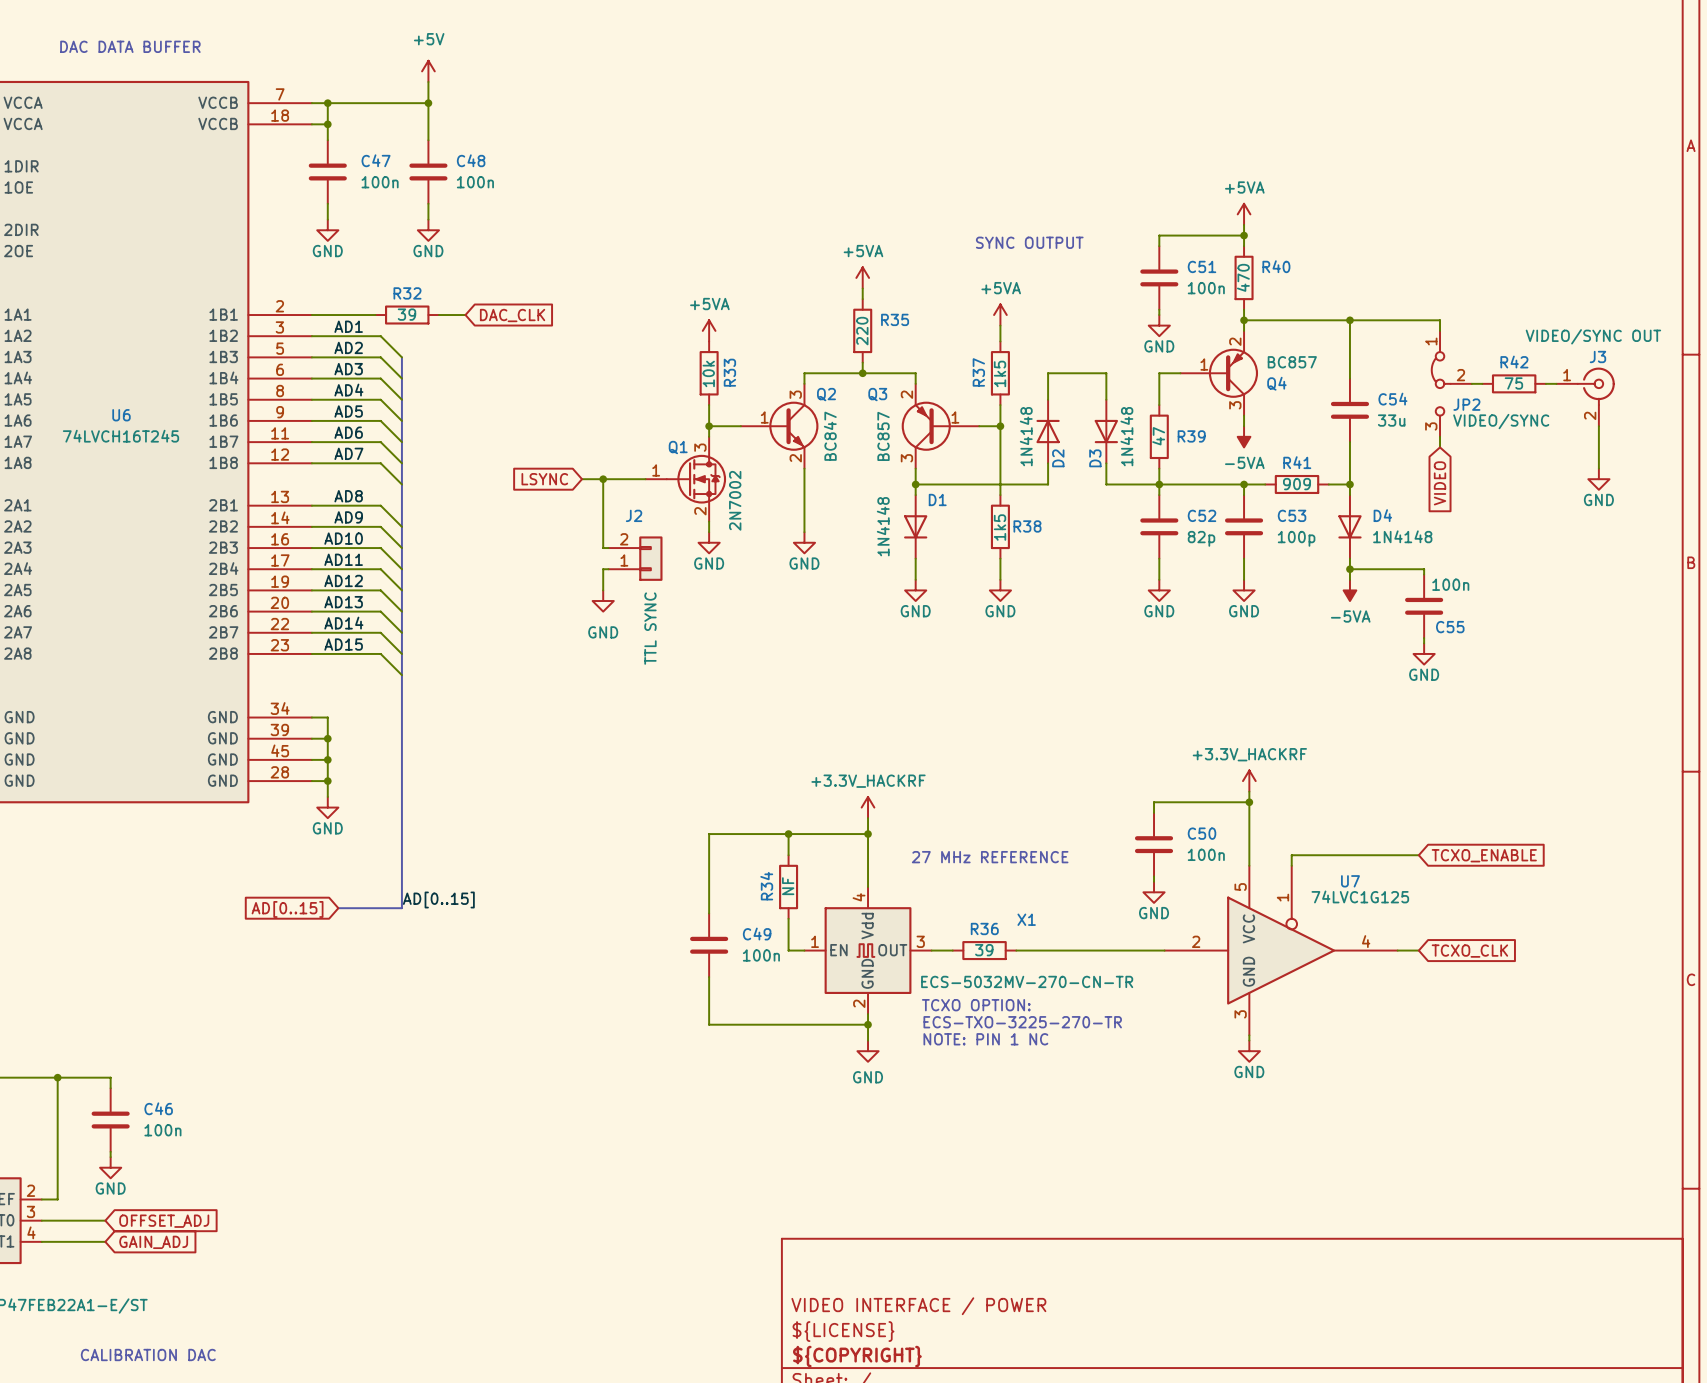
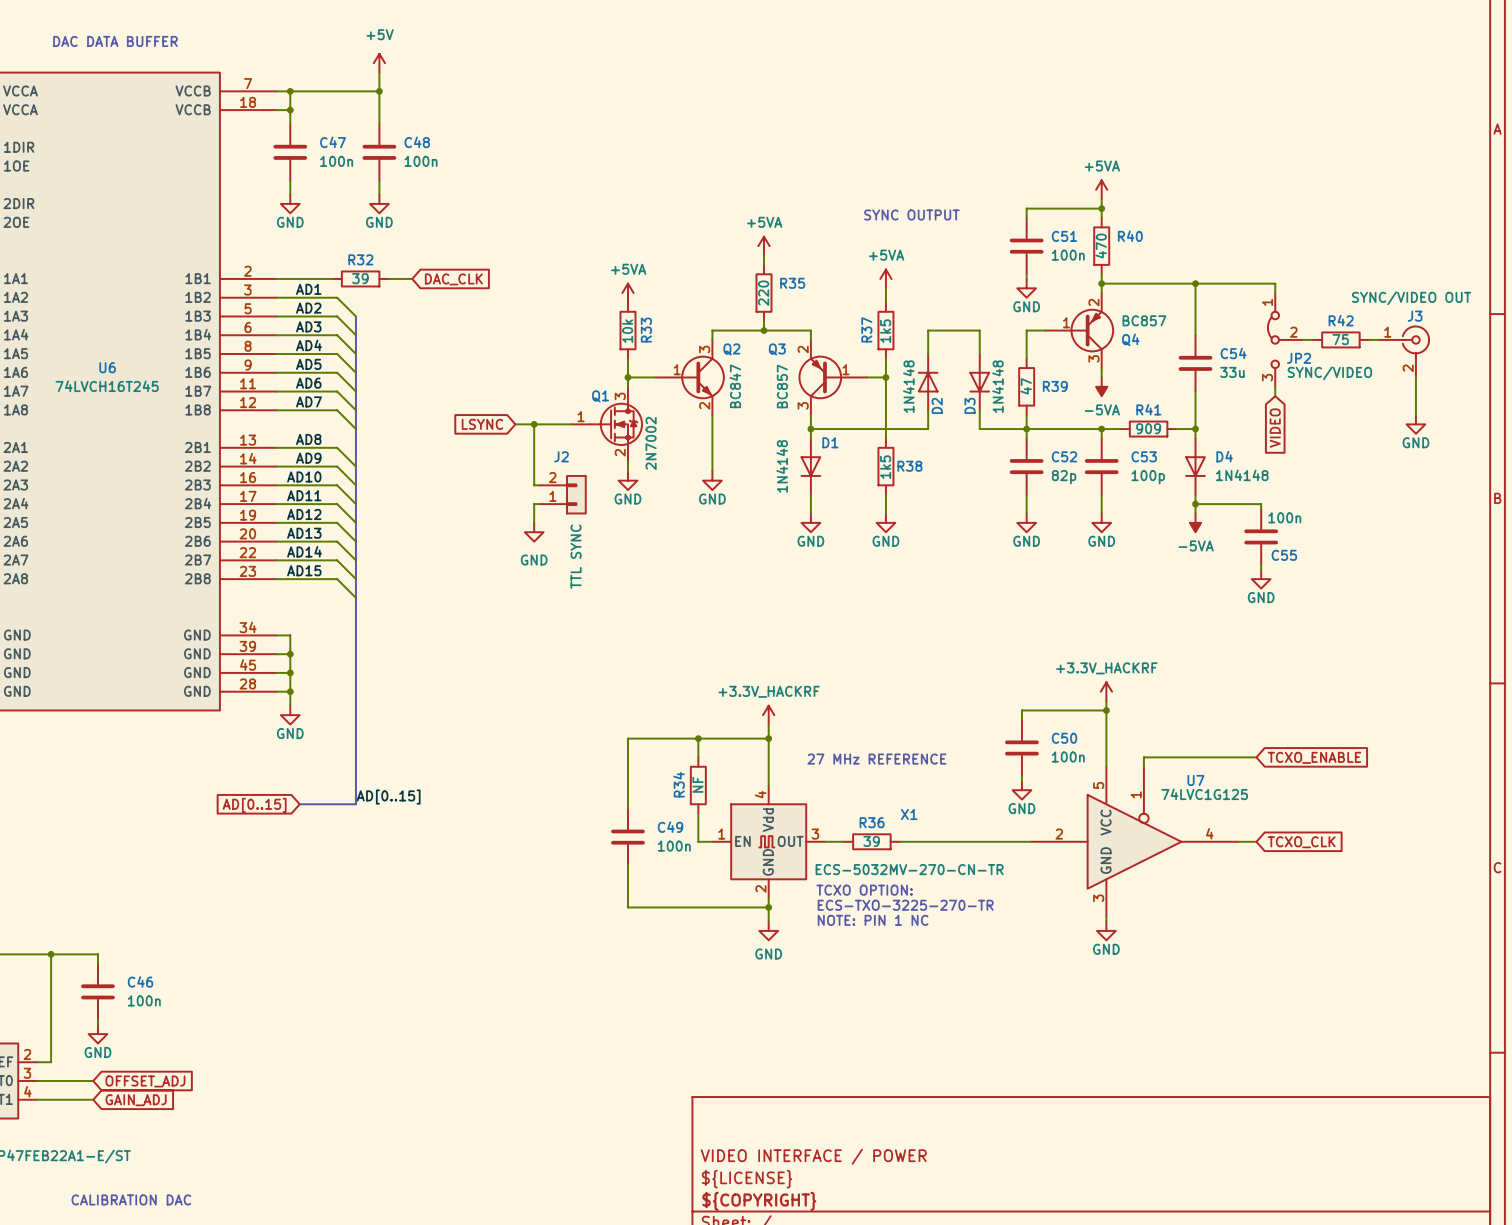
J3 value: VIDEO/SYNC OUT (1593, 336) -> SYNC/VIDEO OUT (1411, 298)
JP2 value: VIDEO/SYNC (1501, 421) -> SYNC/VIDEO (1329, 373)

